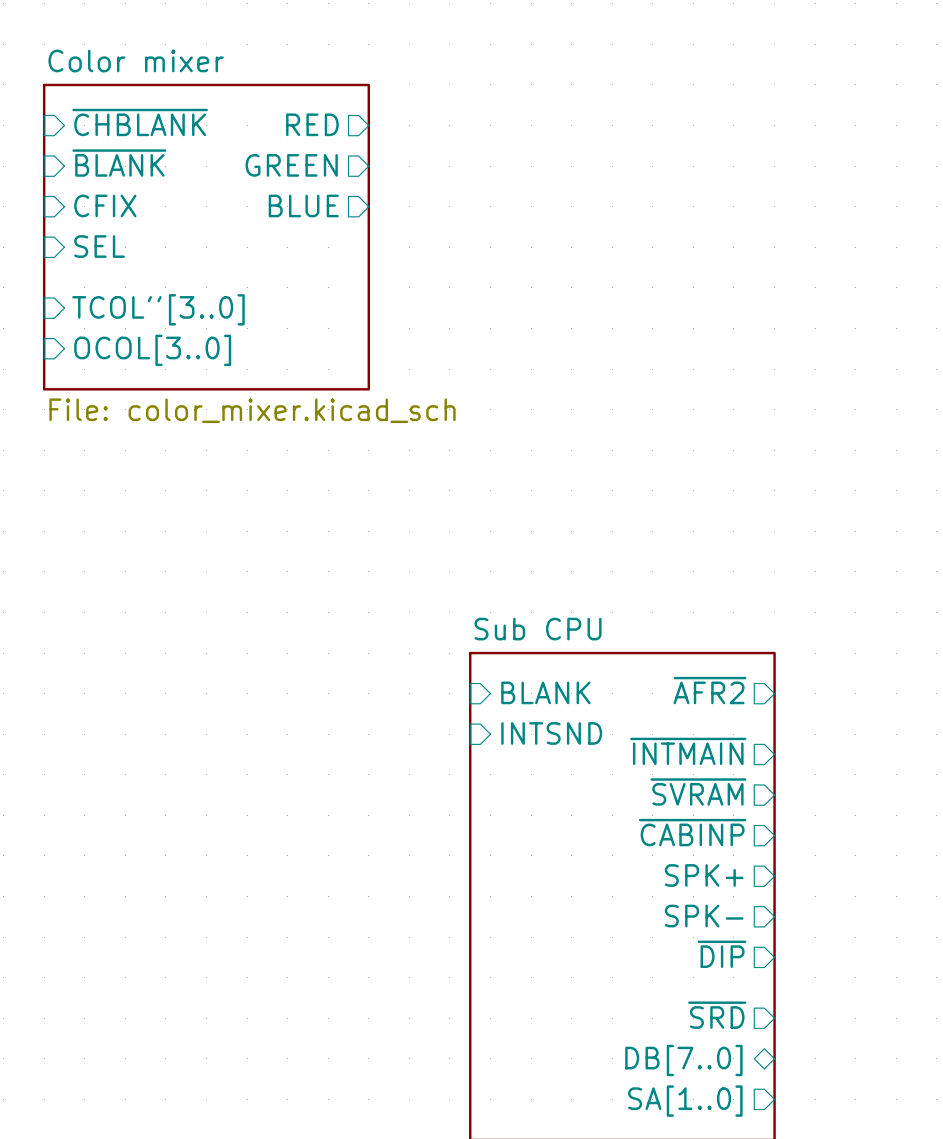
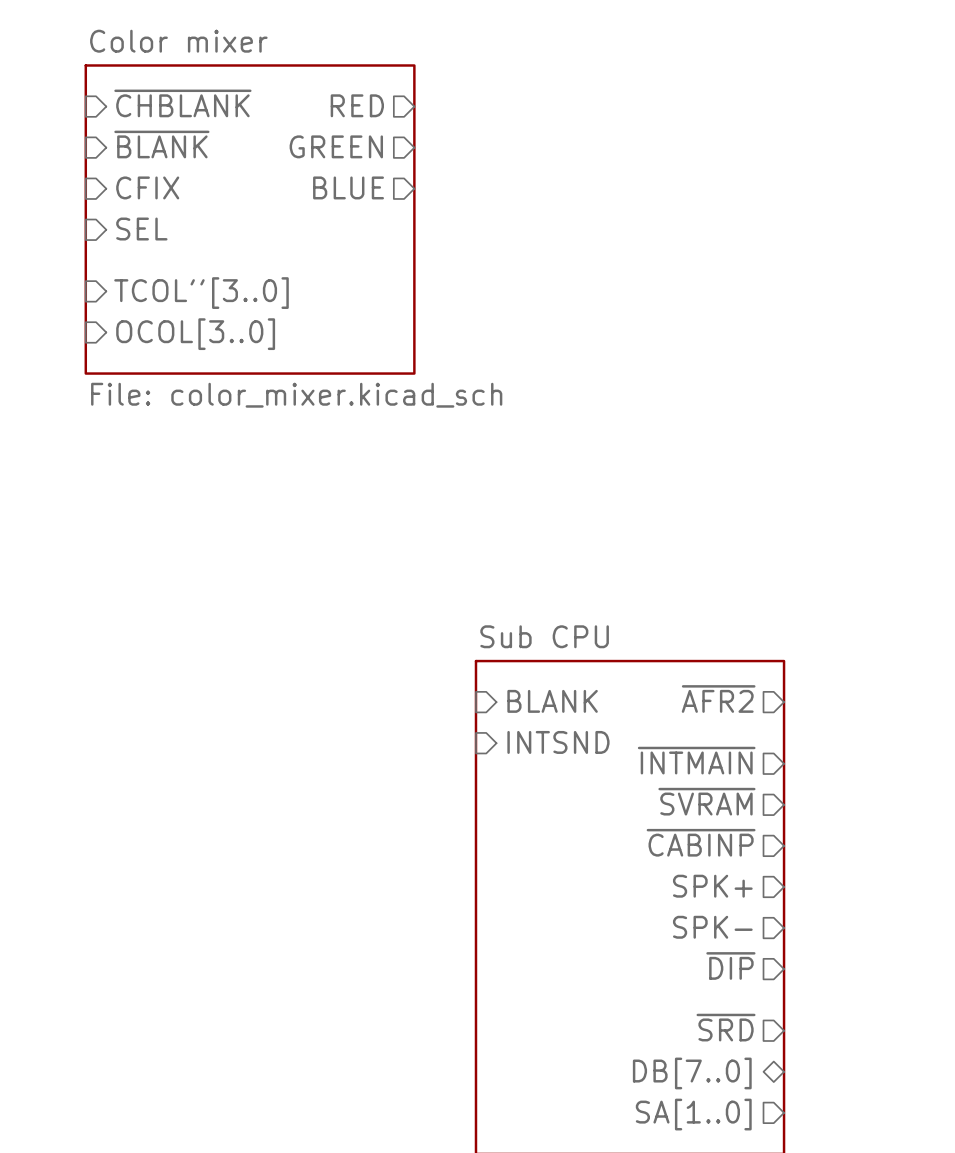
sheet pin position: ~{CHBLANK} (140, 122) -> ~{CHBLANK} (182, 103)
sheet pin position: RED (312, 124) -> RED (357, 105)
sheet pin position: ~{BLANK} (119, 163) -> ~{BLANK} (161, 144)
sheet pin position: GREEN (291, 165) -> GREEN (336, 146)
sheet pin position: CFIX (105, 205) -> CFIX (147, 187)
sheet pin position: BLUE (303, 205) -> BLUE (348, 187)
sheet Color mixer position: (206, 237) -> (250, 219)
sheet pin position: SEL (99, 246) -> SEL (141, 229)
sheet pin position: TCOL''[3..0] (158, 309) -> TCOL''[3..0] (201, 293)
sheet pin position: OCOL[3..0] (152, 350) -> OCOL[3..0] (195, 334)

